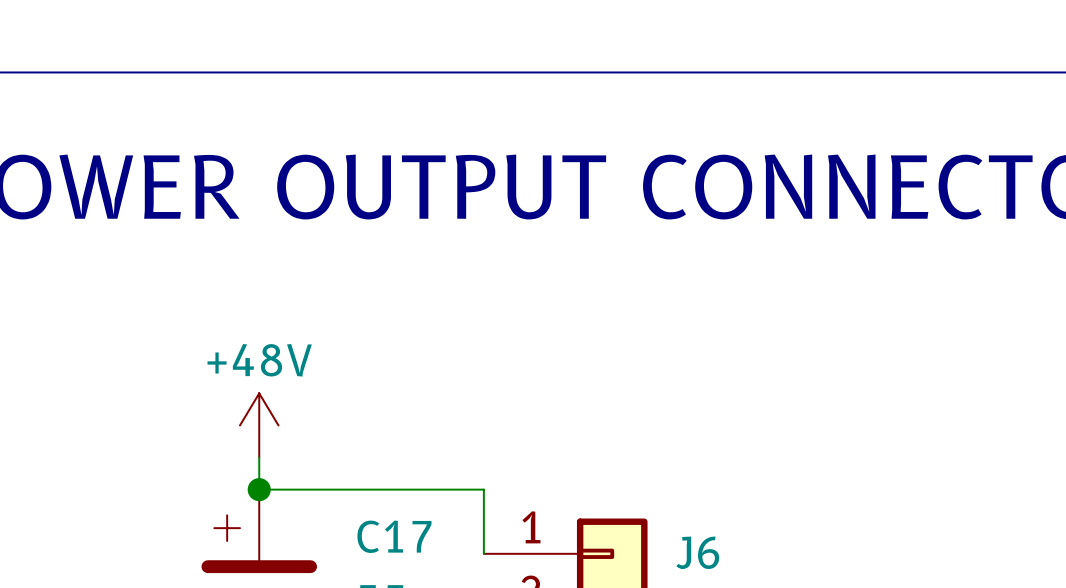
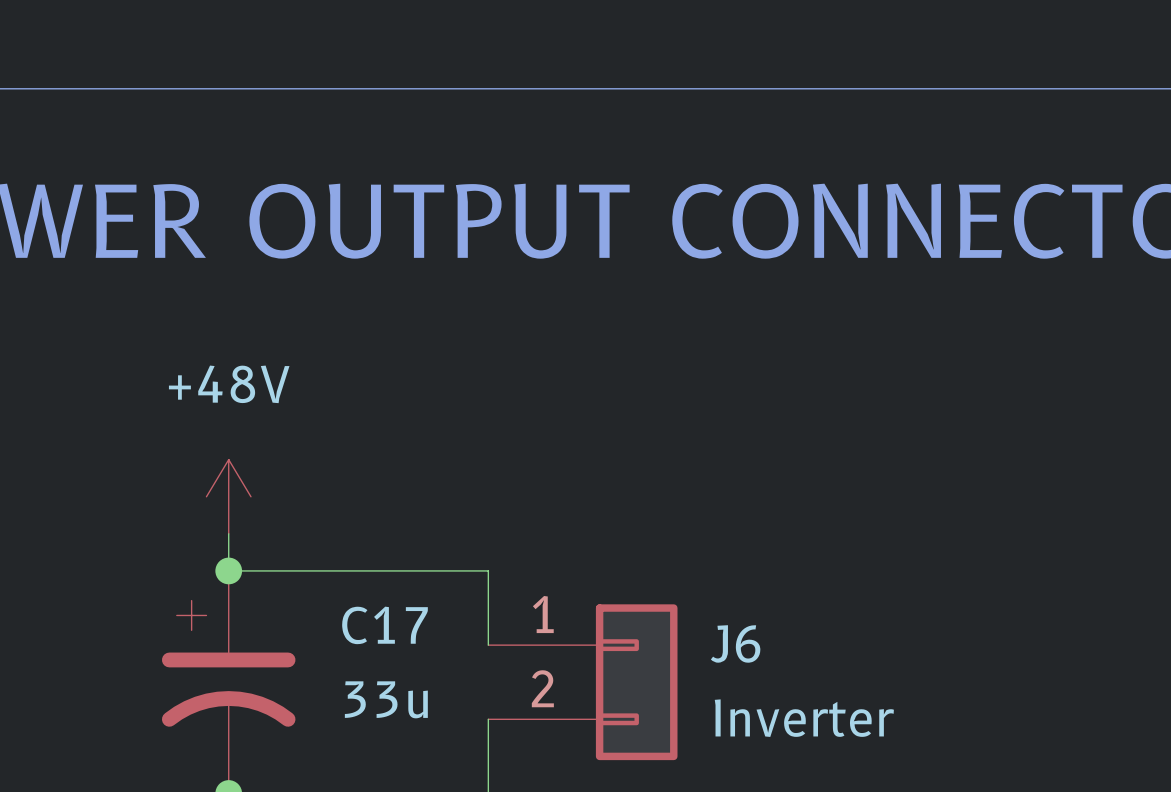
power symbol text position: +48V (259, 360) -> +48V (229, 384)

